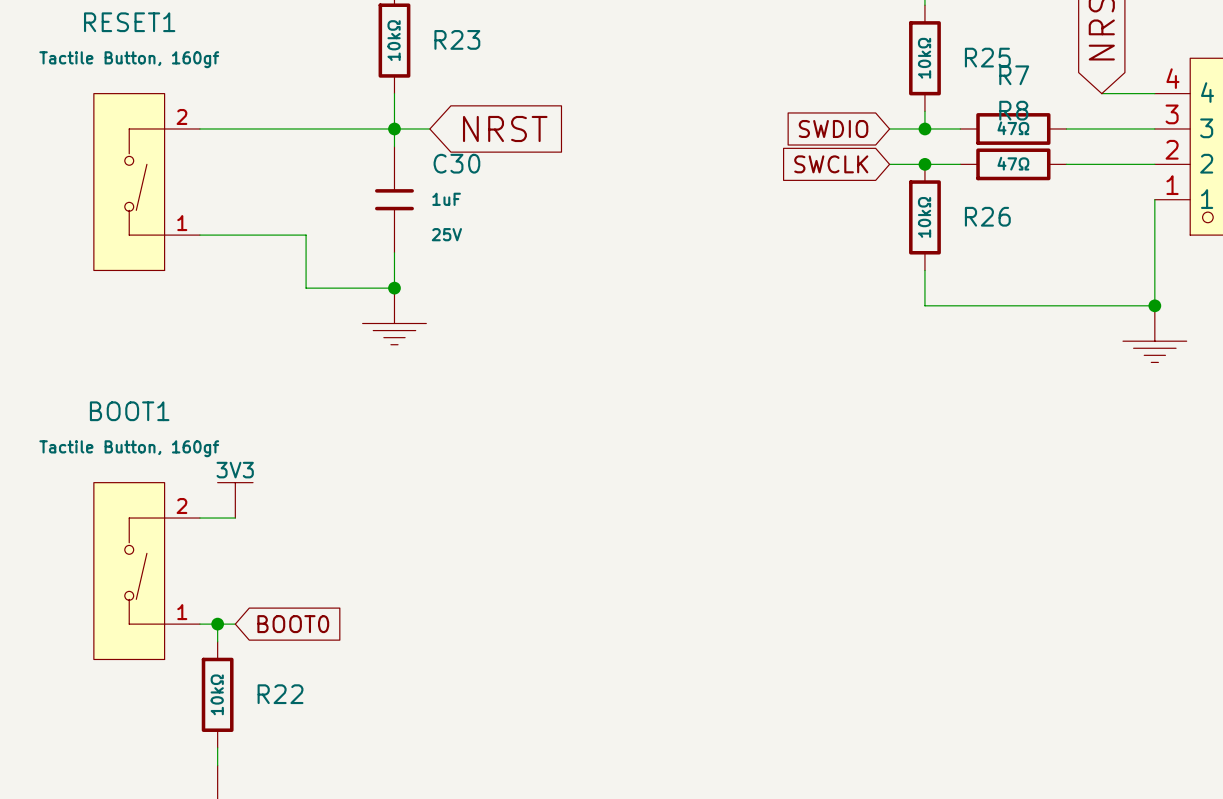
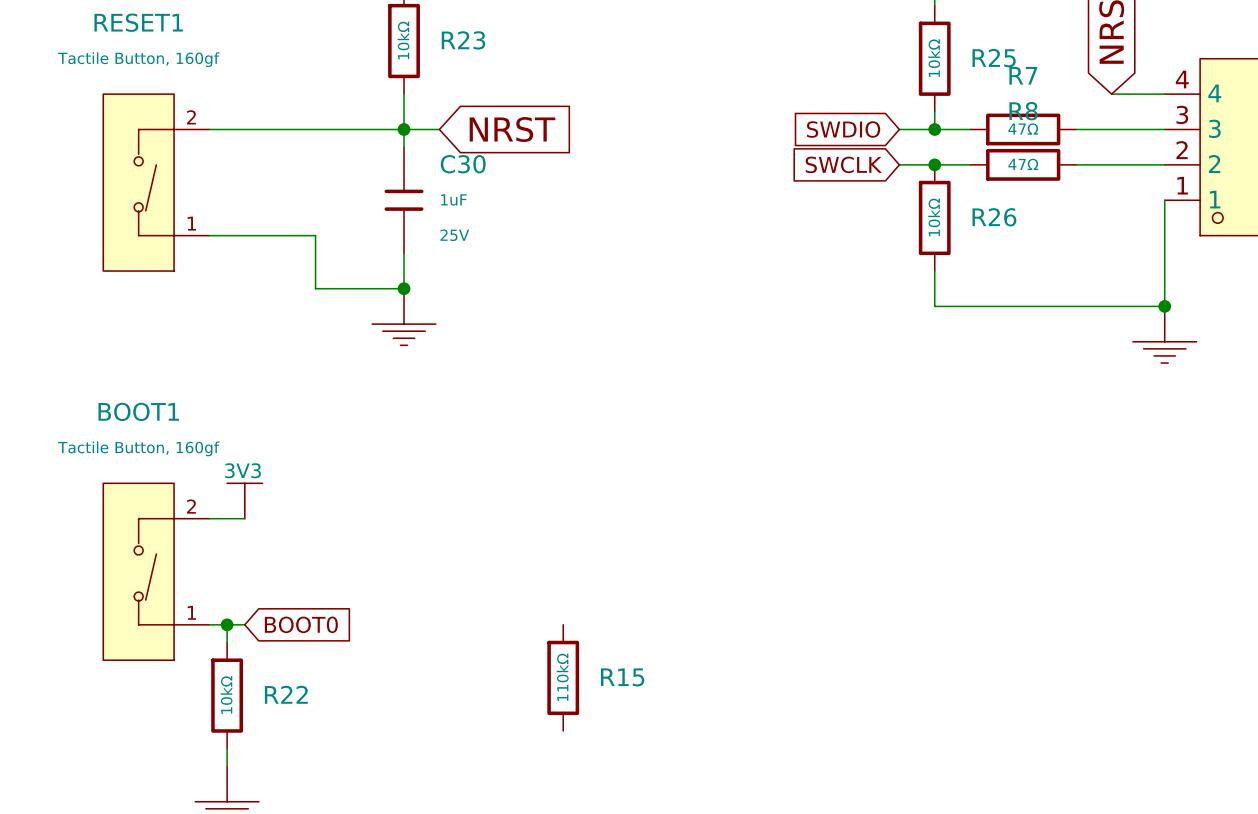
R15: none -> 110kΩ (563, 677)

